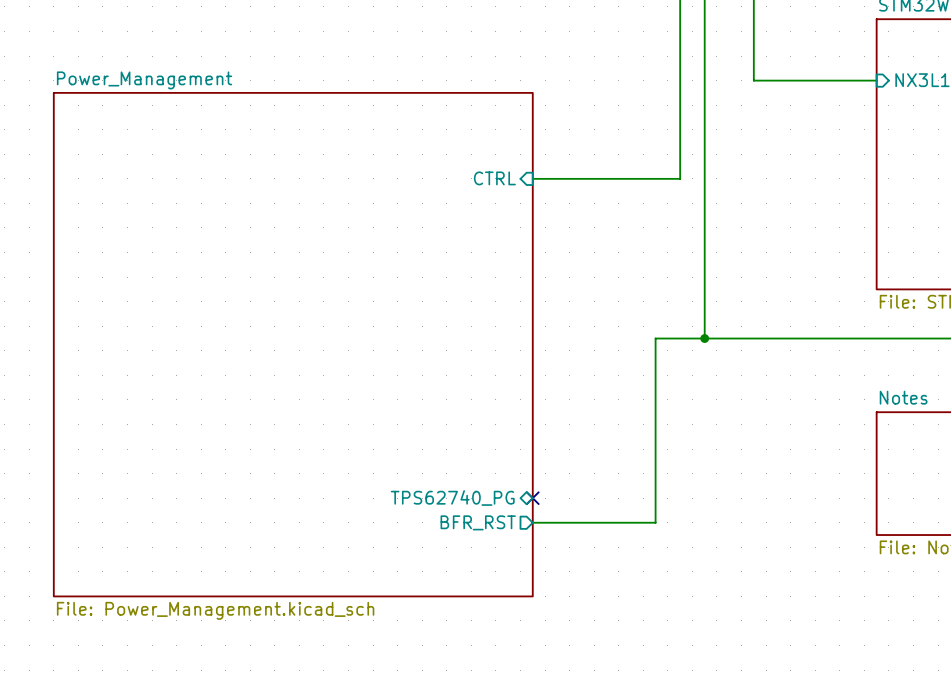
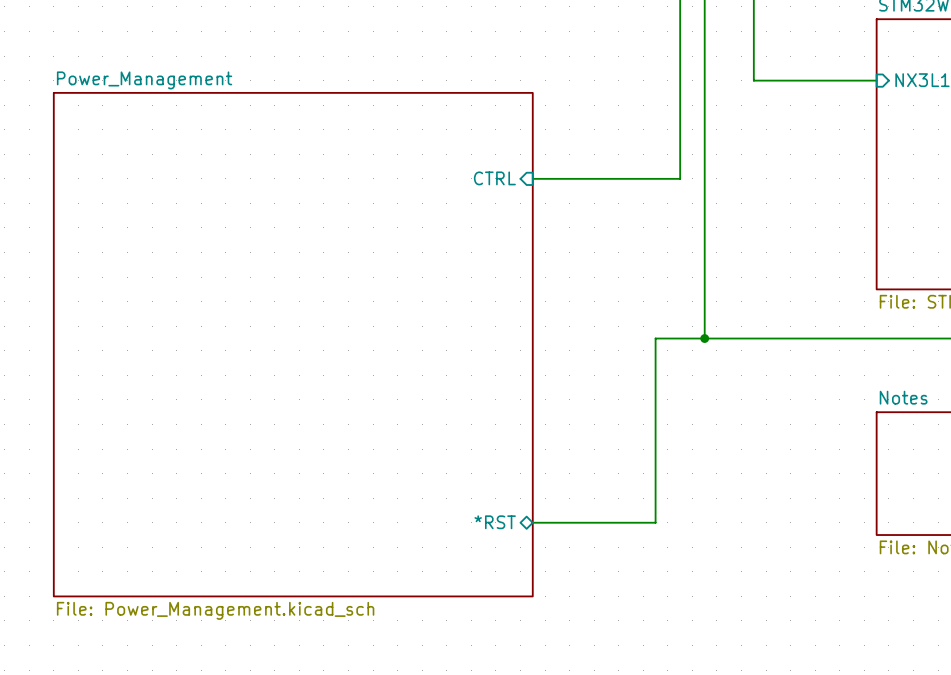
sheet pin: TPS62740_PG (452, 498) -> none
no-connect mark: (532, 498) -> none
sheet pin shape: output (478, 522) -> bidirectional (495, 522)
sheet pin: BFR_RST (478, 522) -> *RST (495, 522)

